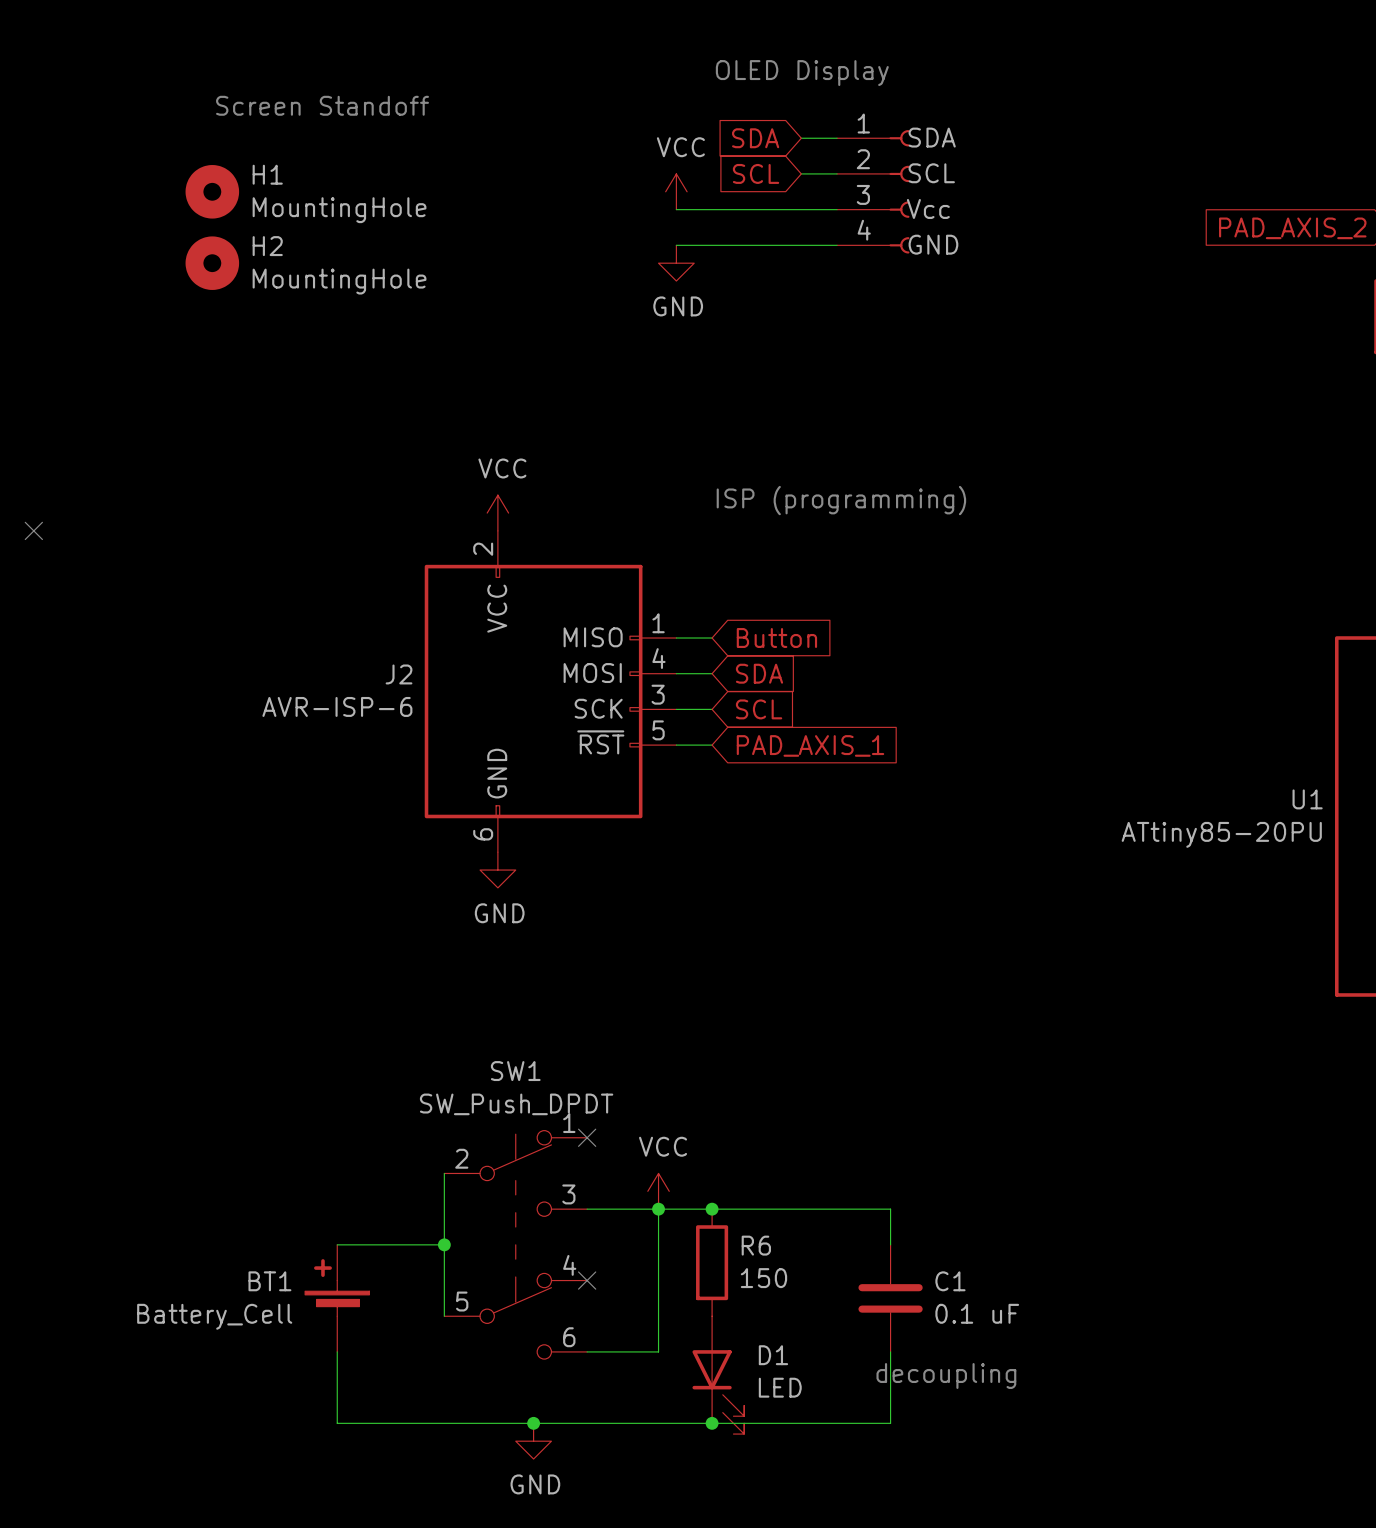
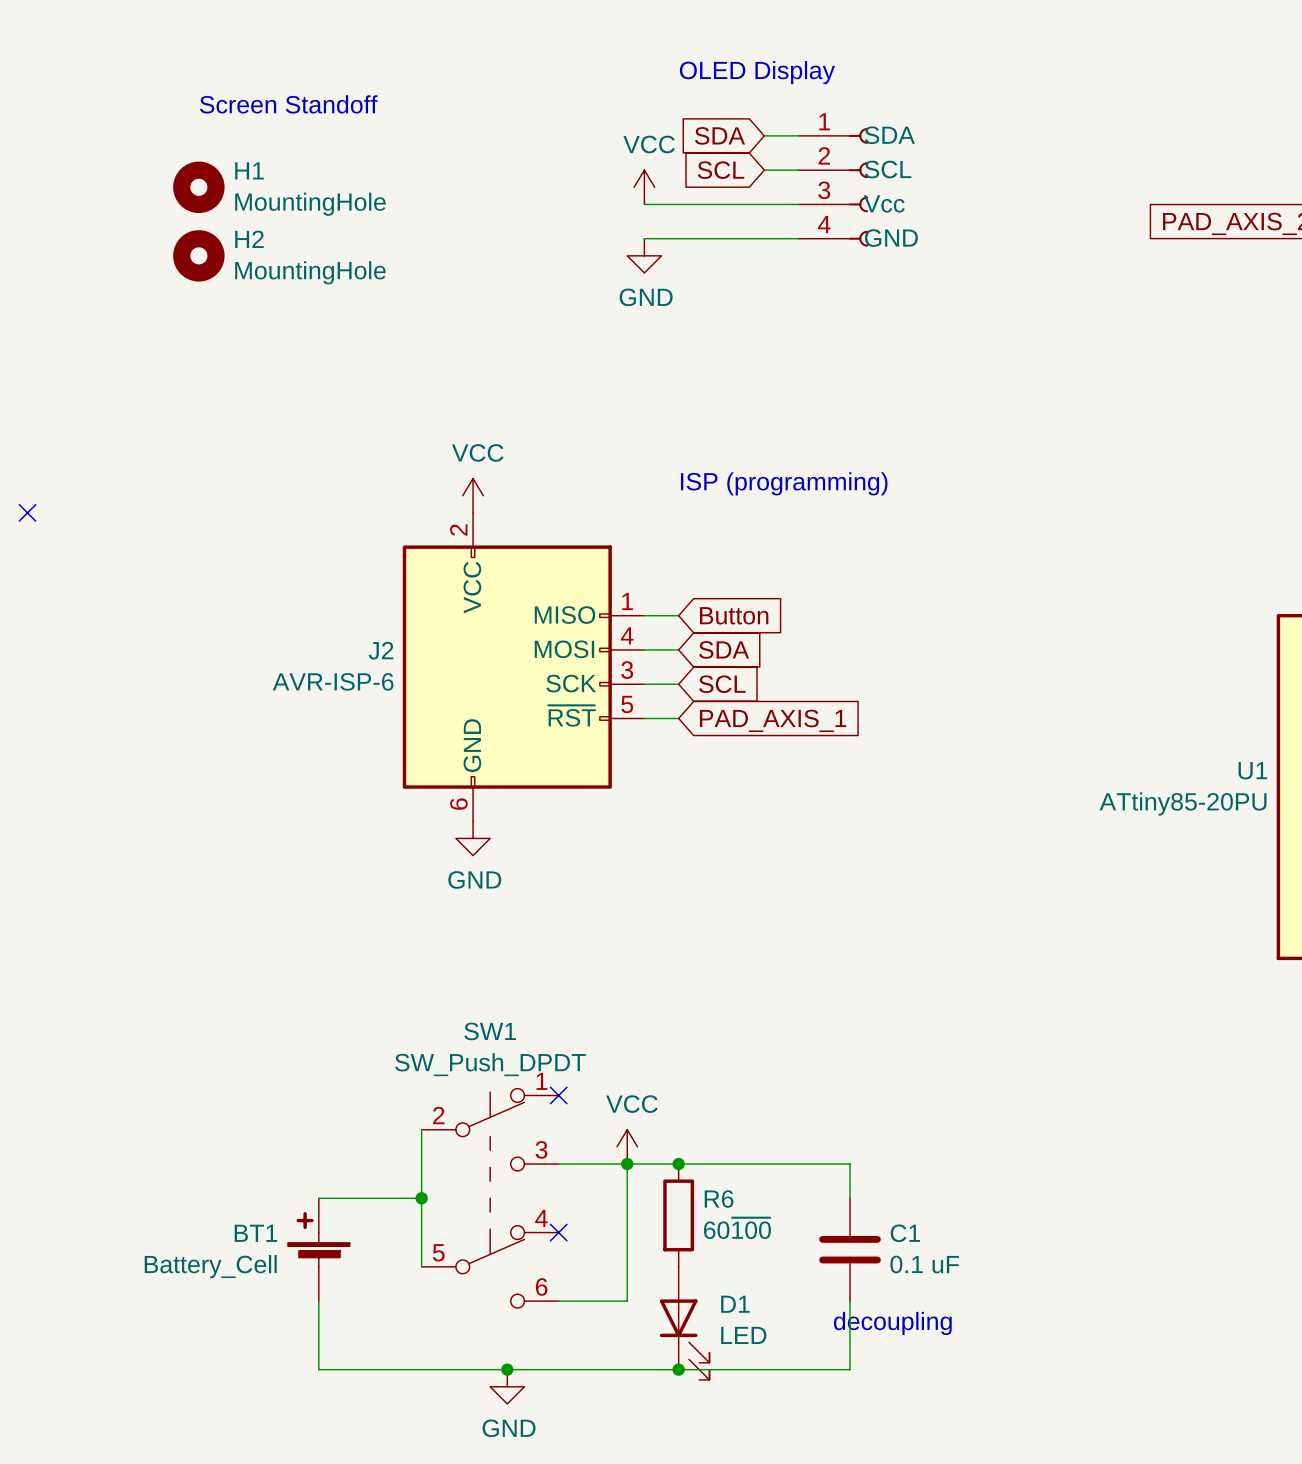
R6 value: 150 (763, 1278) -> 60~{100} (737, 1228)

